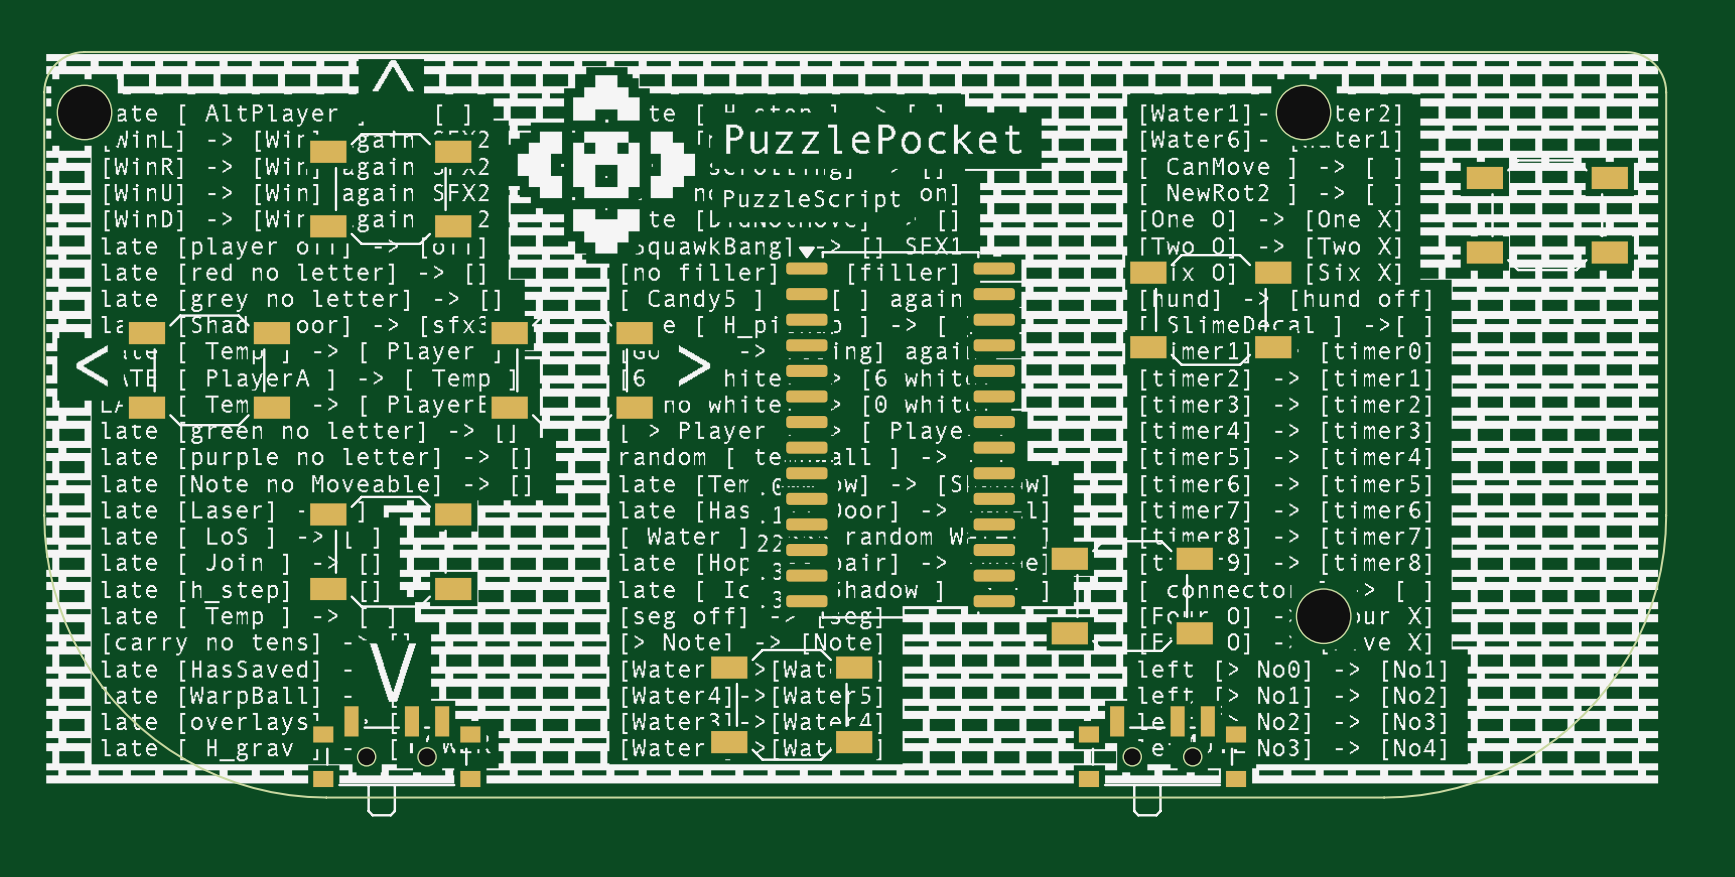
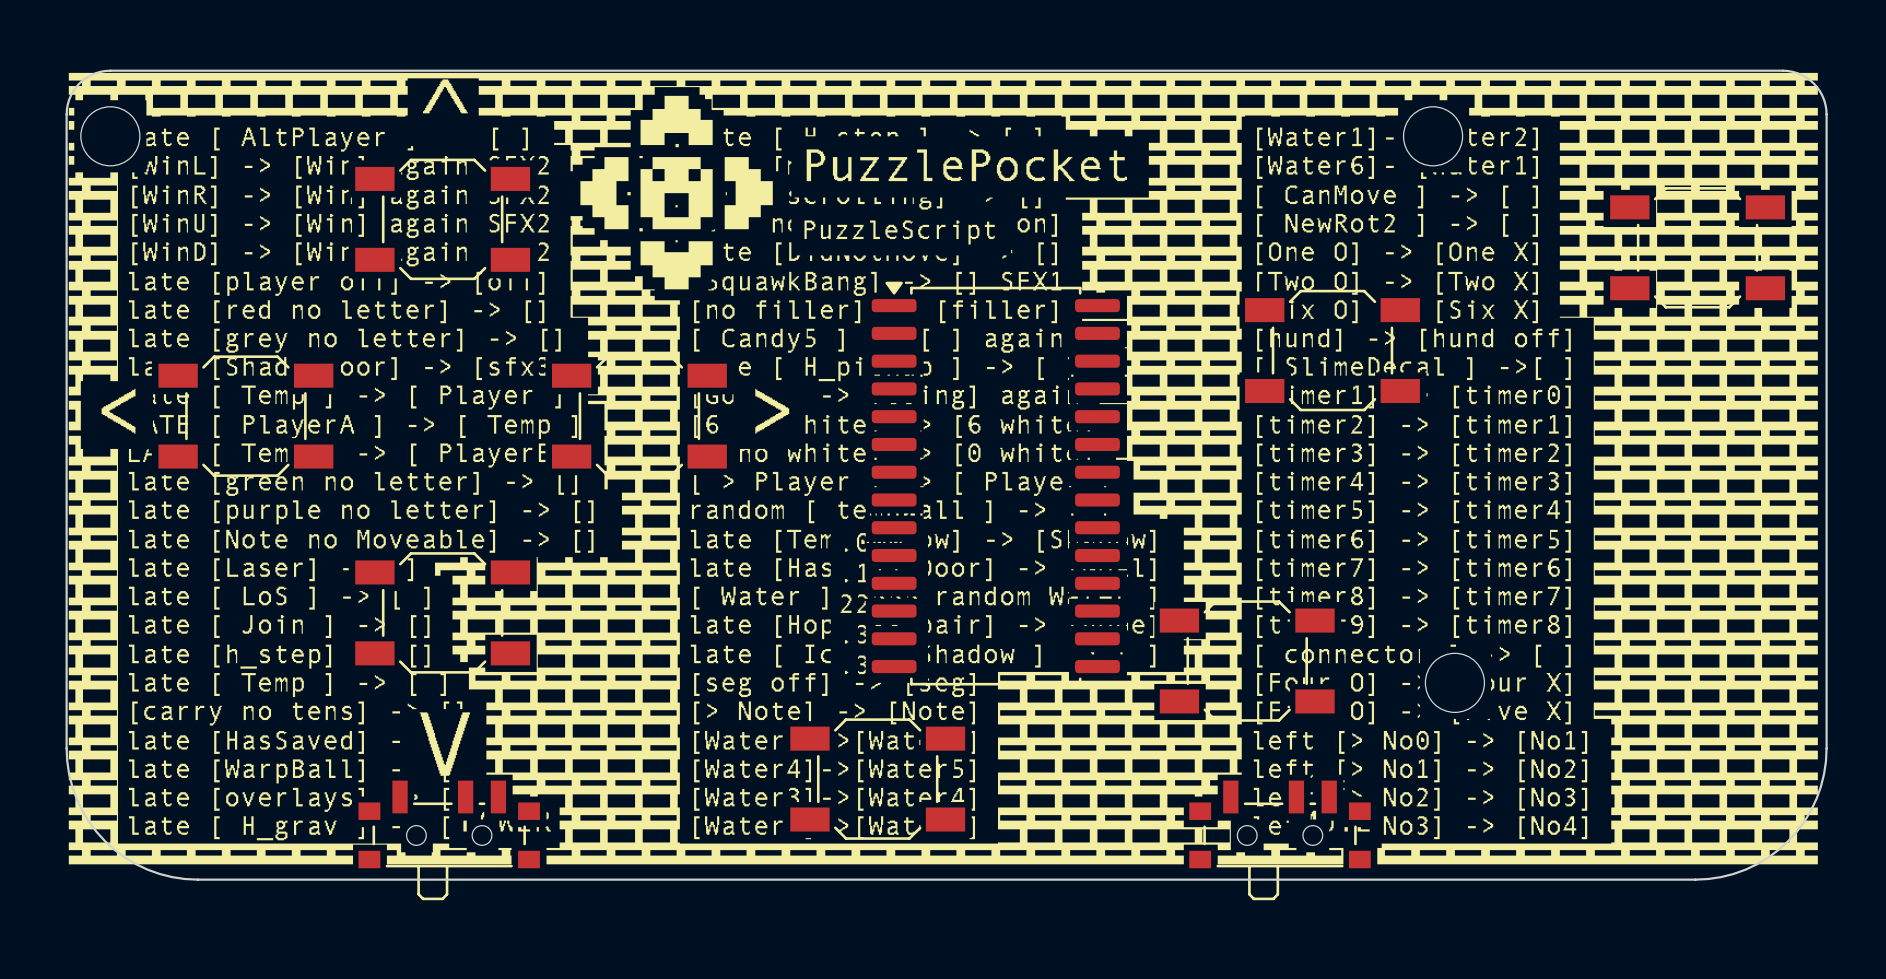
board edge: (44, 515) (49, 570) (65, 623) (91, 672) (126, 714) (169, 750) (218, 776) (271, 792) (326, 797) -> (66, 573) (67, 761) (76, 798) (88, 821) (105, 841) (124, 857) (147, 869) (184, 879) (372, 879)
board edge: (1666, 515) (1660, 570) (1644, 623) (1618, 672) (1583, 714) (1540, 750) (1492, 776) (1439, 792) (1384, 797) -> (1826, 573) (1825, 761) (1820, 786) (1811, 810) (1788, 841) (1757, 864) (1733, 873) (1708, 879) (1520, 879)

